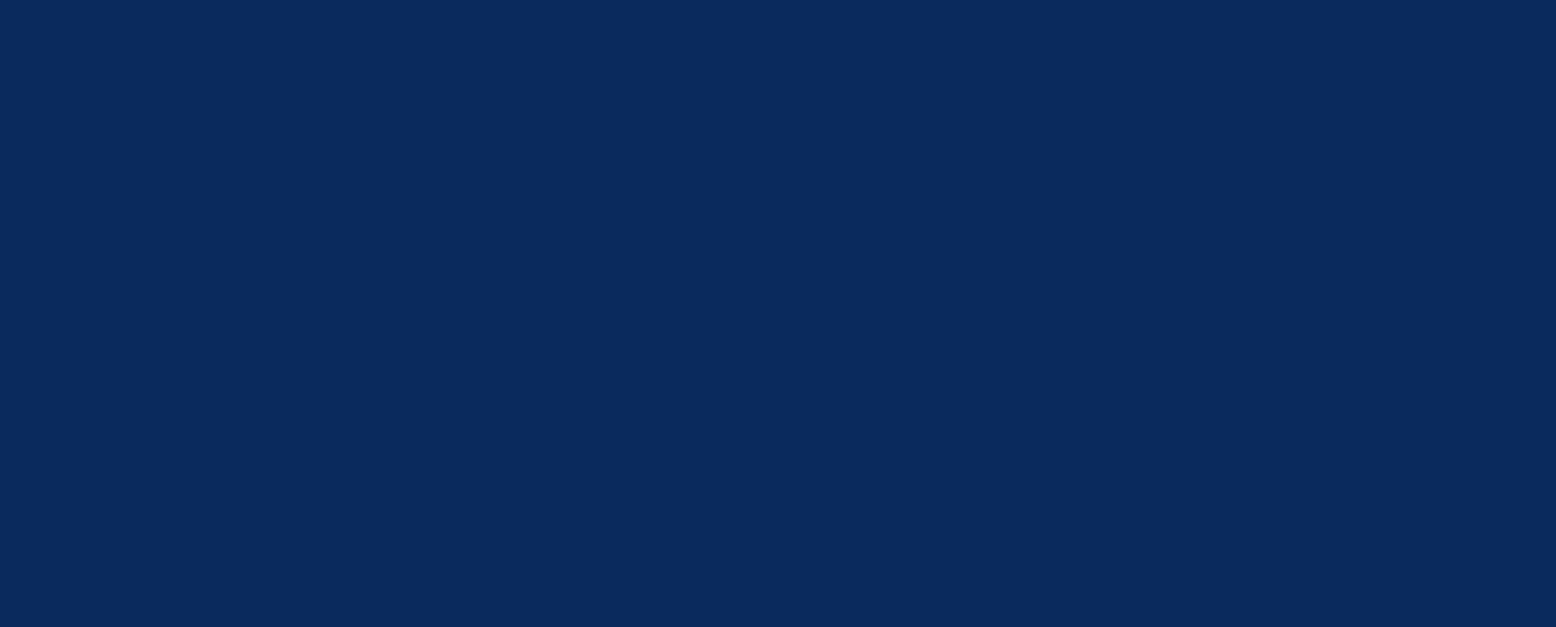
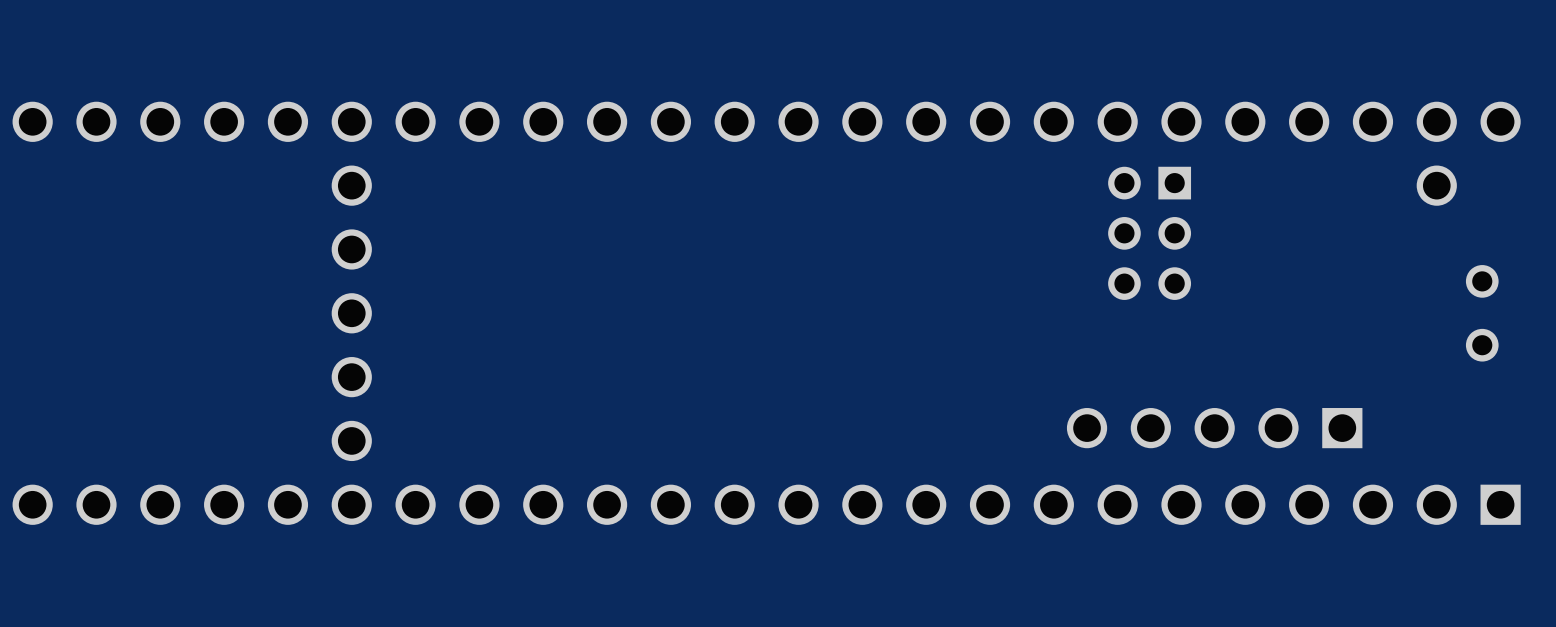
part: none -> (766, 313)

